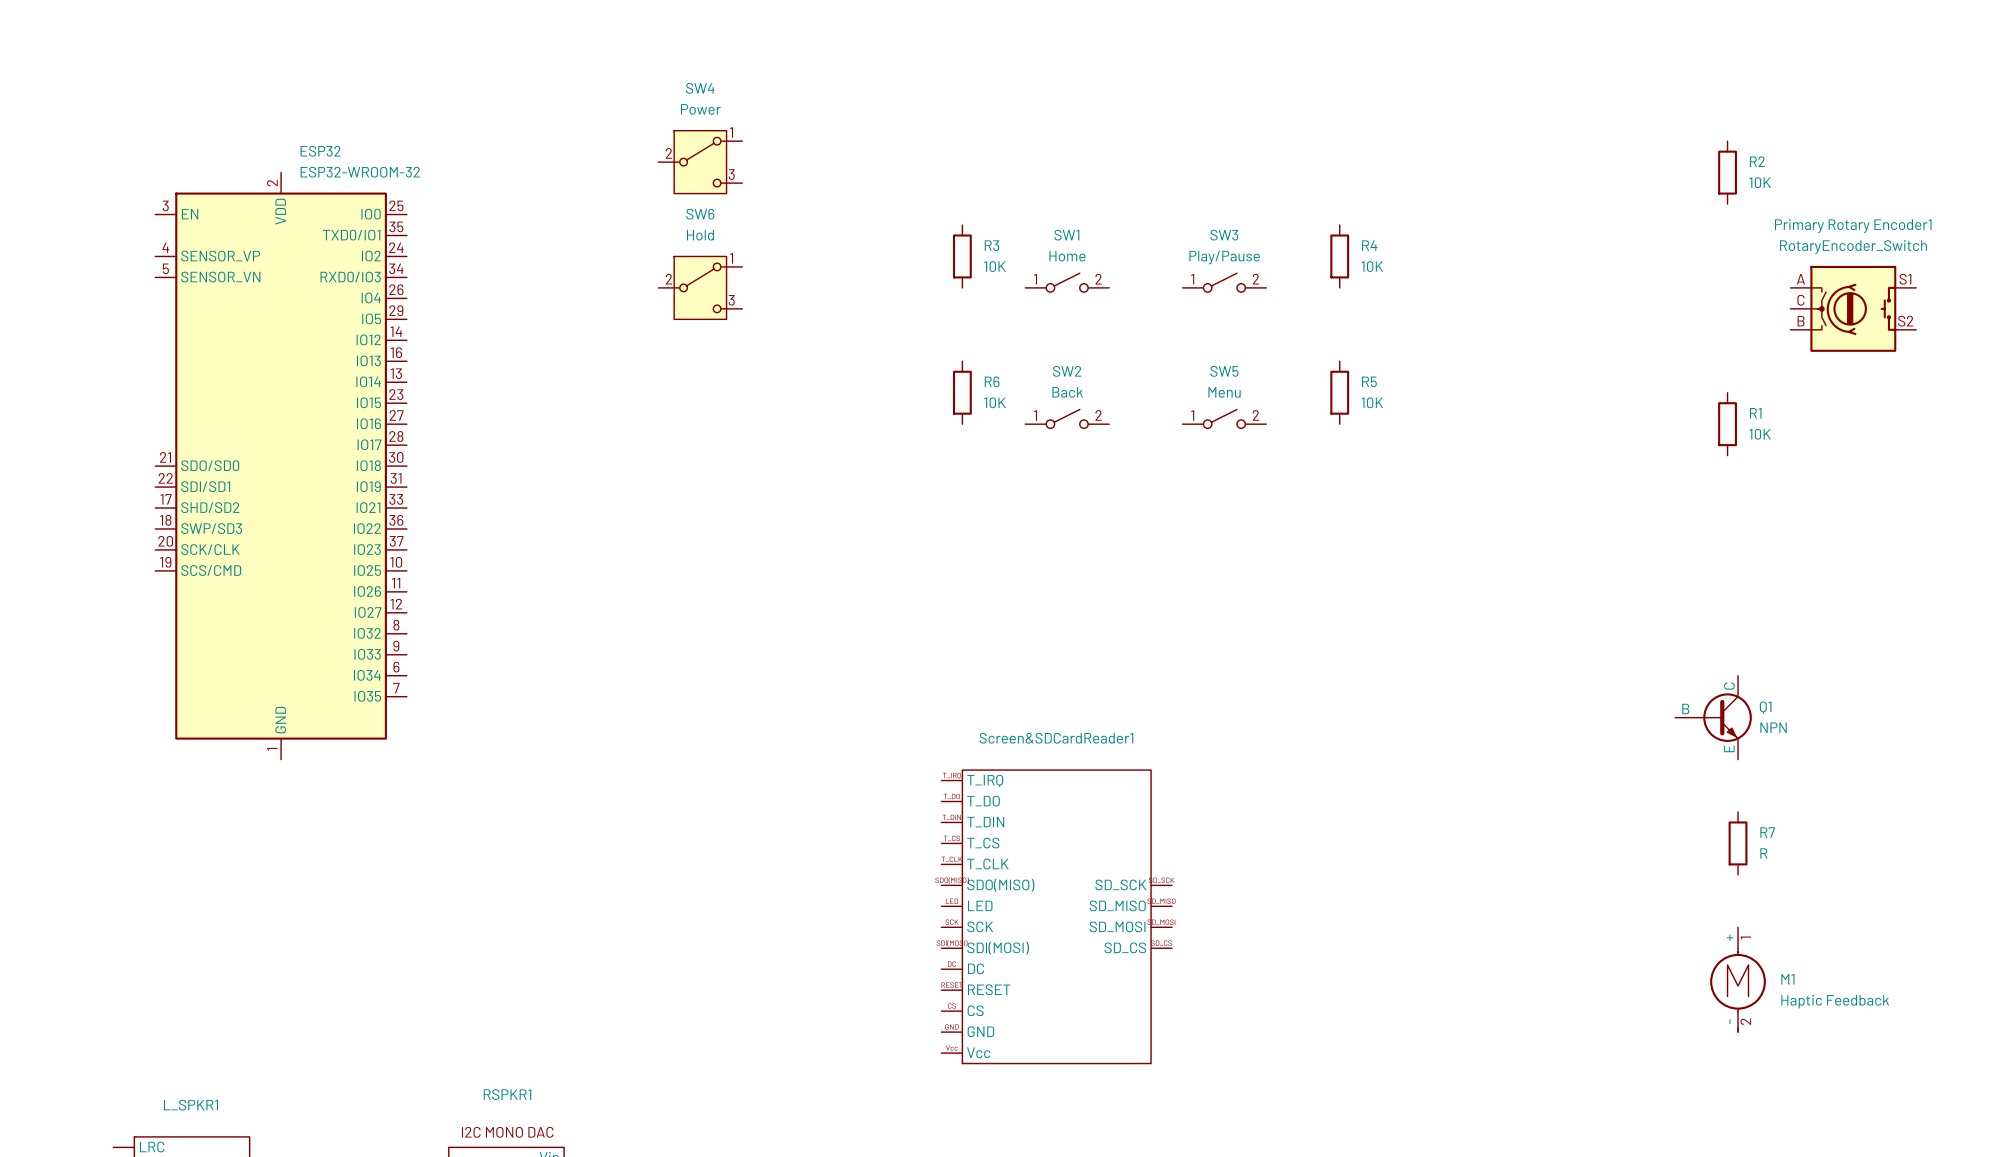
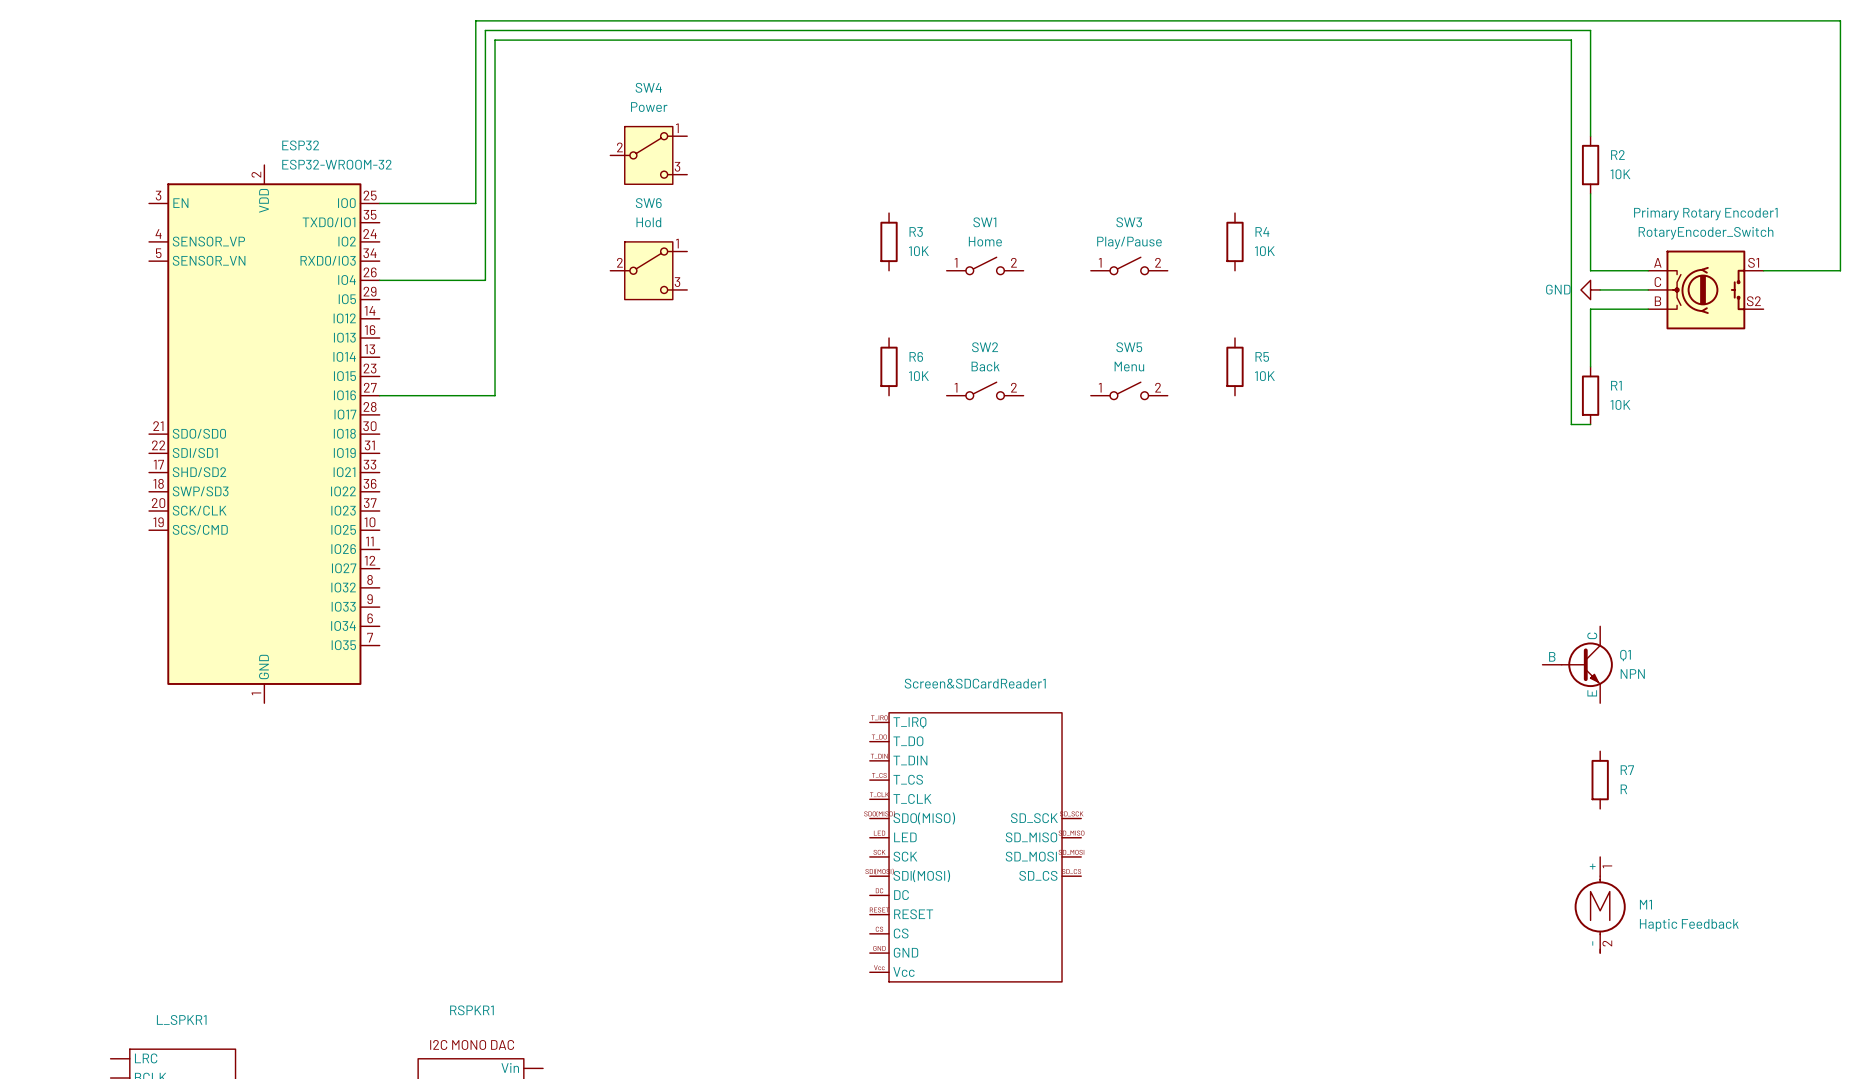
wire: none -> (1590, 136) (1590, 30) (485, 30) (485, 280) (379, 280)
wire: none -> (1590, 193) (1590, 270) (1648, 270)
wire: none -> (379, 203) (475, 203) (475, 20) (1840, 20) (1840, 270) (1763, 270)
power symbol: none -> GND (1590, 289)
wire: none -> (1600, 289) (1648, 289)
wire: none -> (1648, 309) (1590, 309) (1590, 366)
wire: none -> (379, 395) (495, 395) (495, 40) (1571, 40) (1571, 424) (1590, 424)

